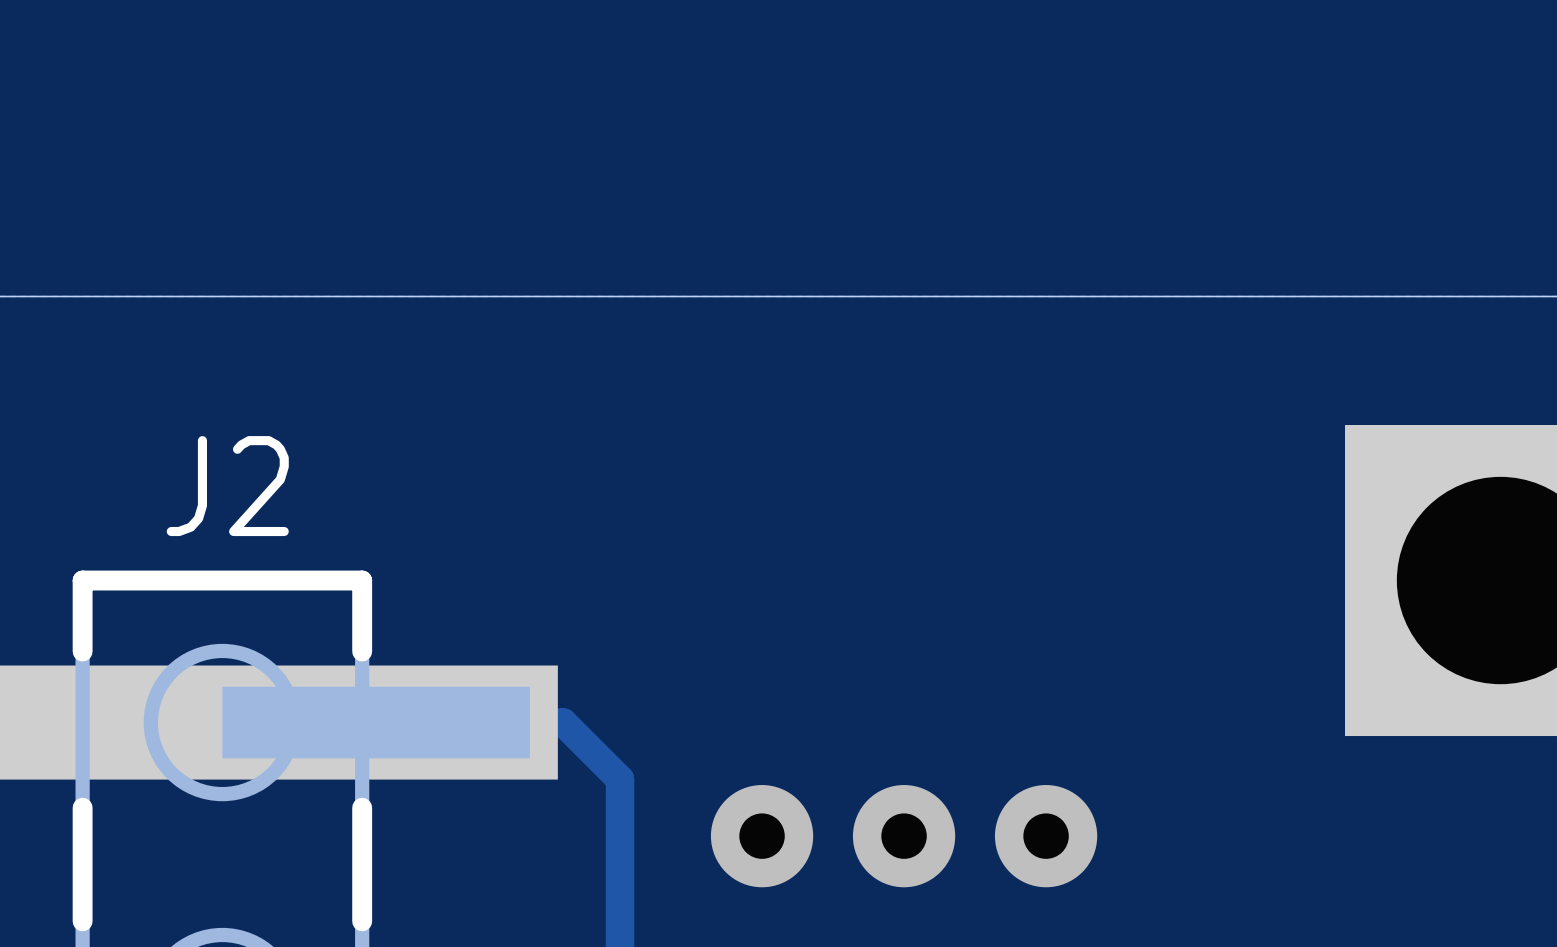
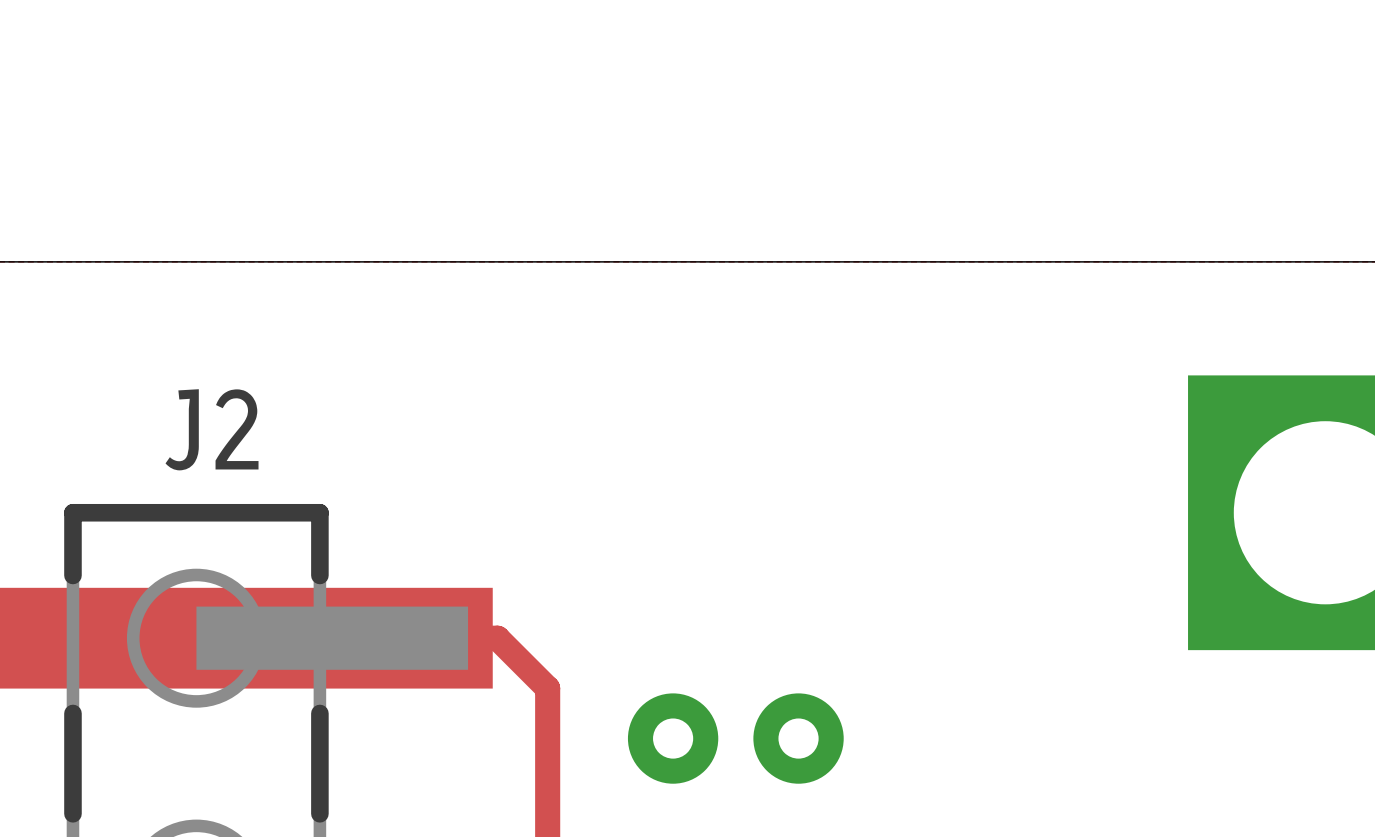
via: (1046, 836) -> none

